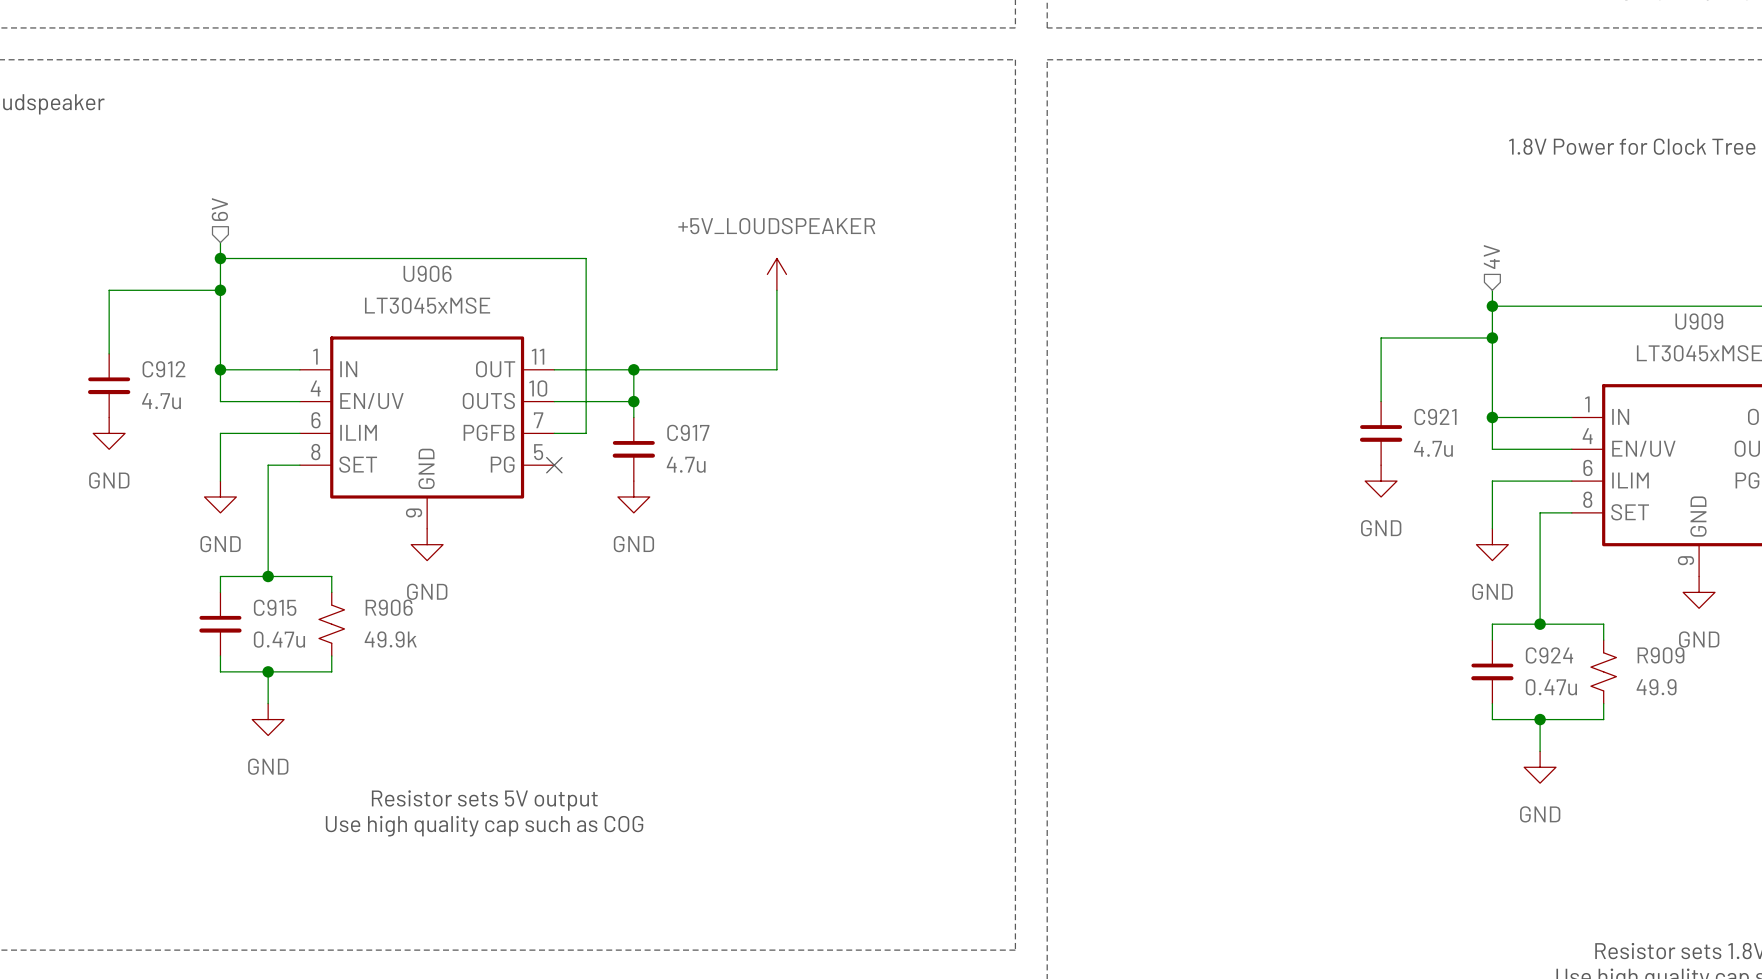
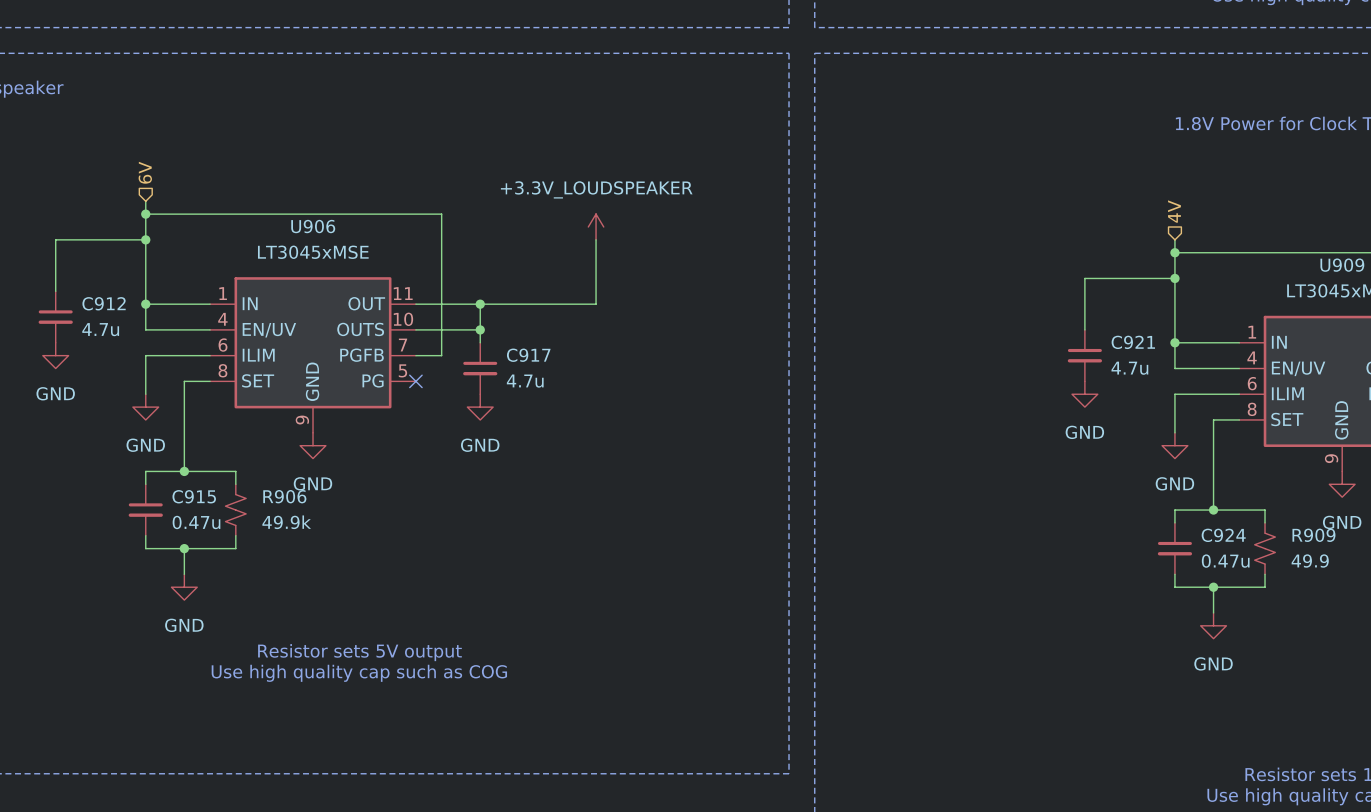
power symbol: +5V_LOUDSPEAKER (776, 274) -> +3.3V_LOUDSPEAKER (596, 227)

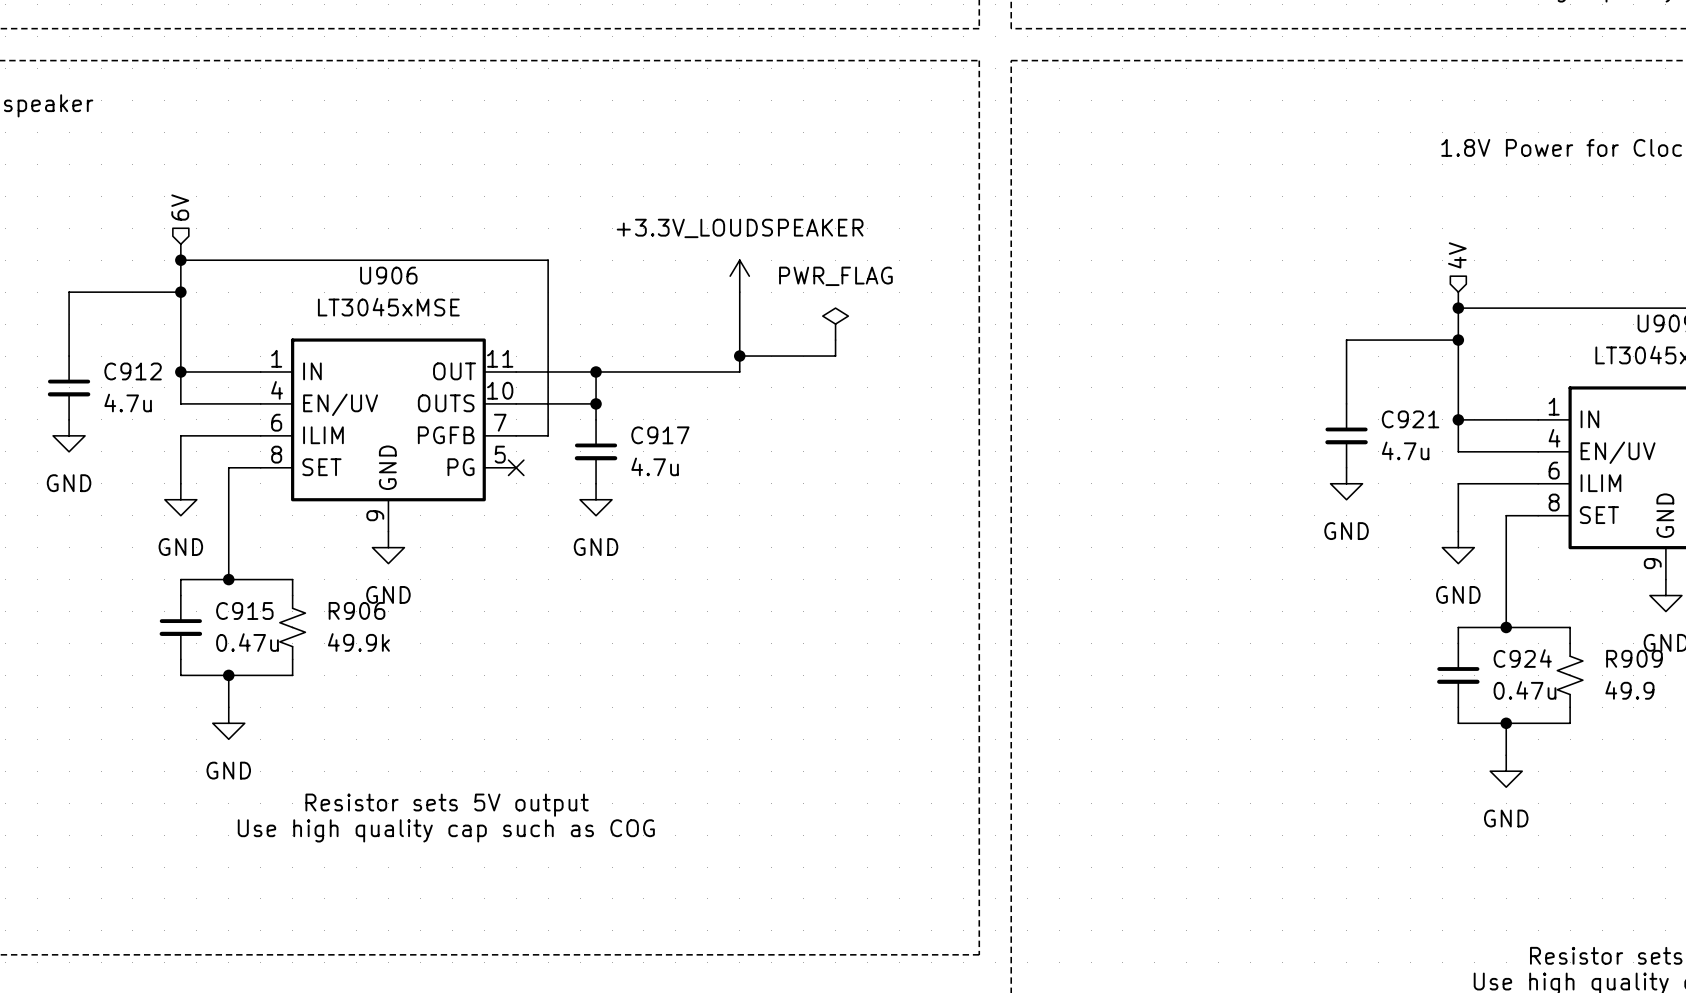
power symbol: none -> PWR_FLAG (835, 324)
wire: none -> (835, 340) (835, 356) (739, 356)
junction: none -> (739, 356)

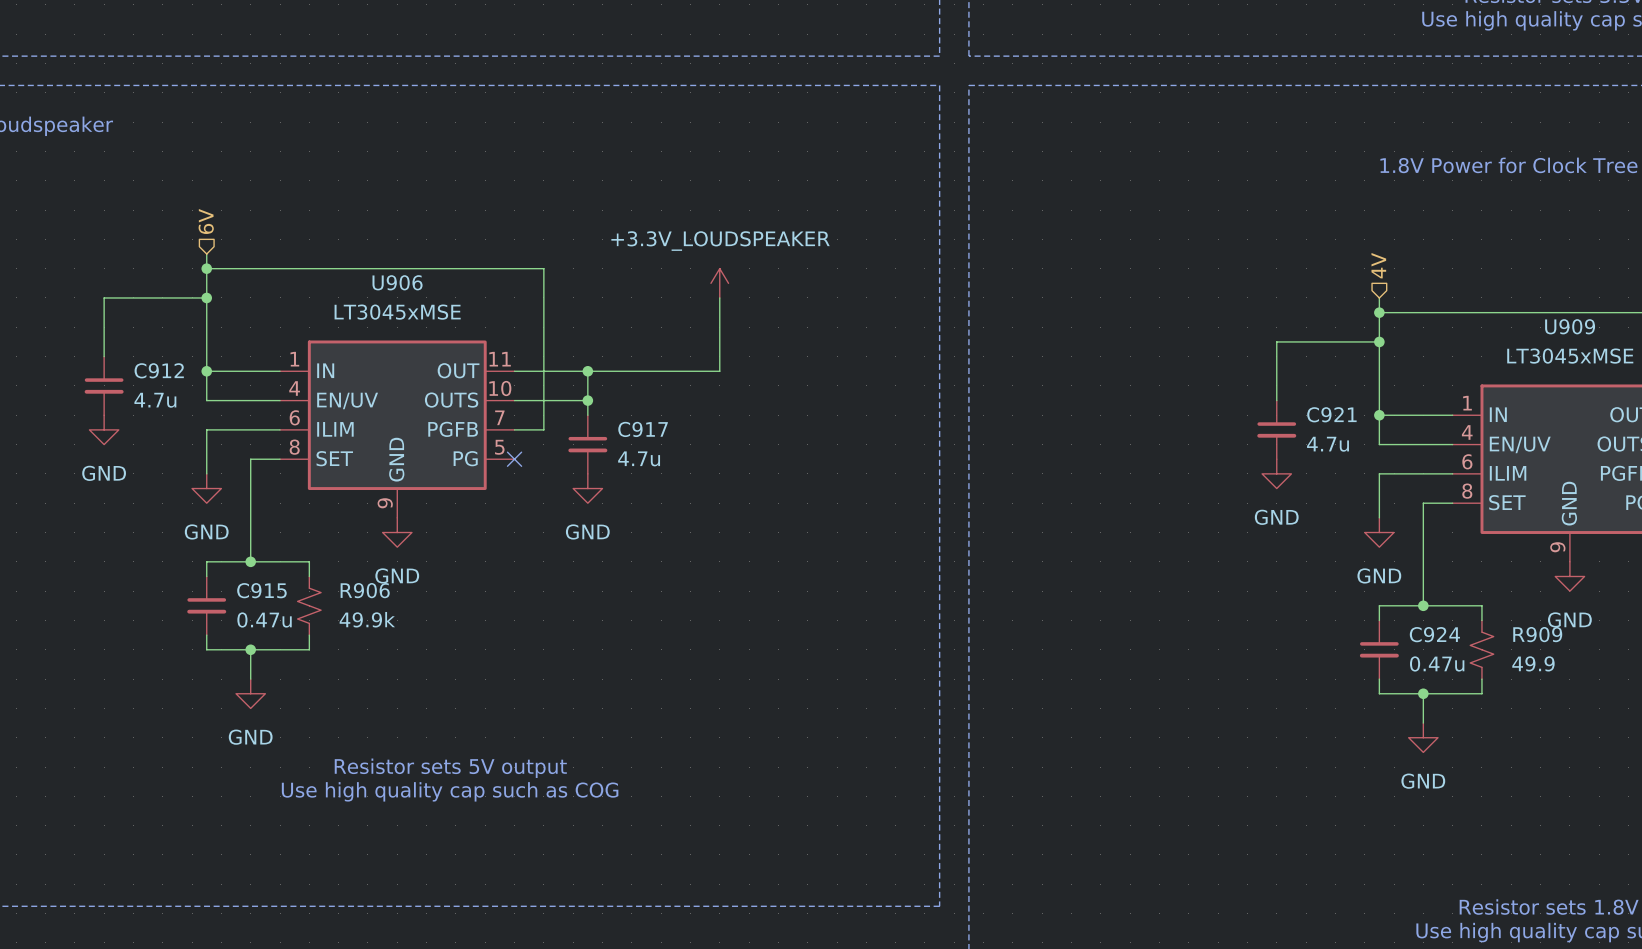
power symbol: PWR_FLAG (835, 324) -> none
wire: (835, 340) (835, 356) (739, 356) -> none
junction: (739, 356) -> none

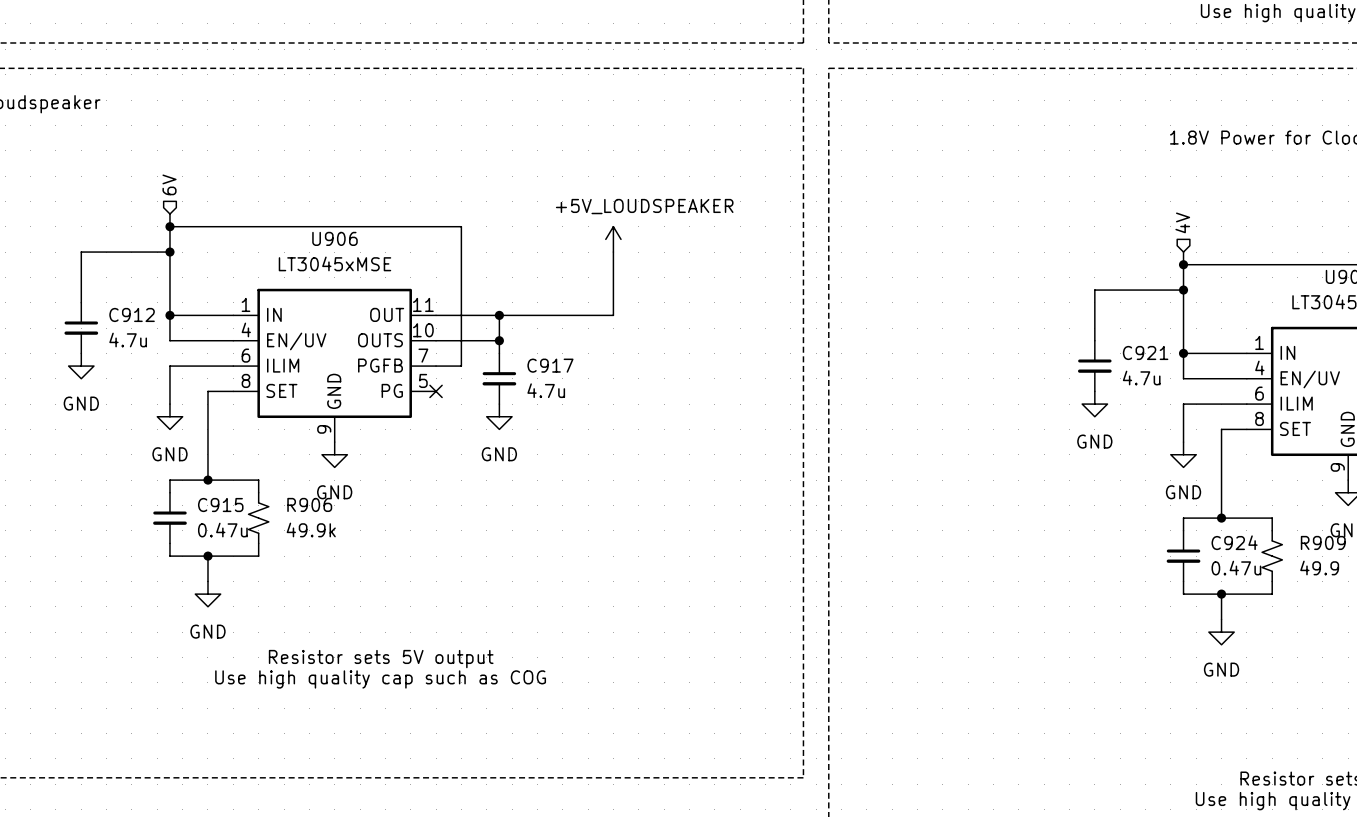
power symbol: +3.3V_LOUDSPEAKER (719, 283) -> +5V_LOUDSPEAKER (613, 239)

